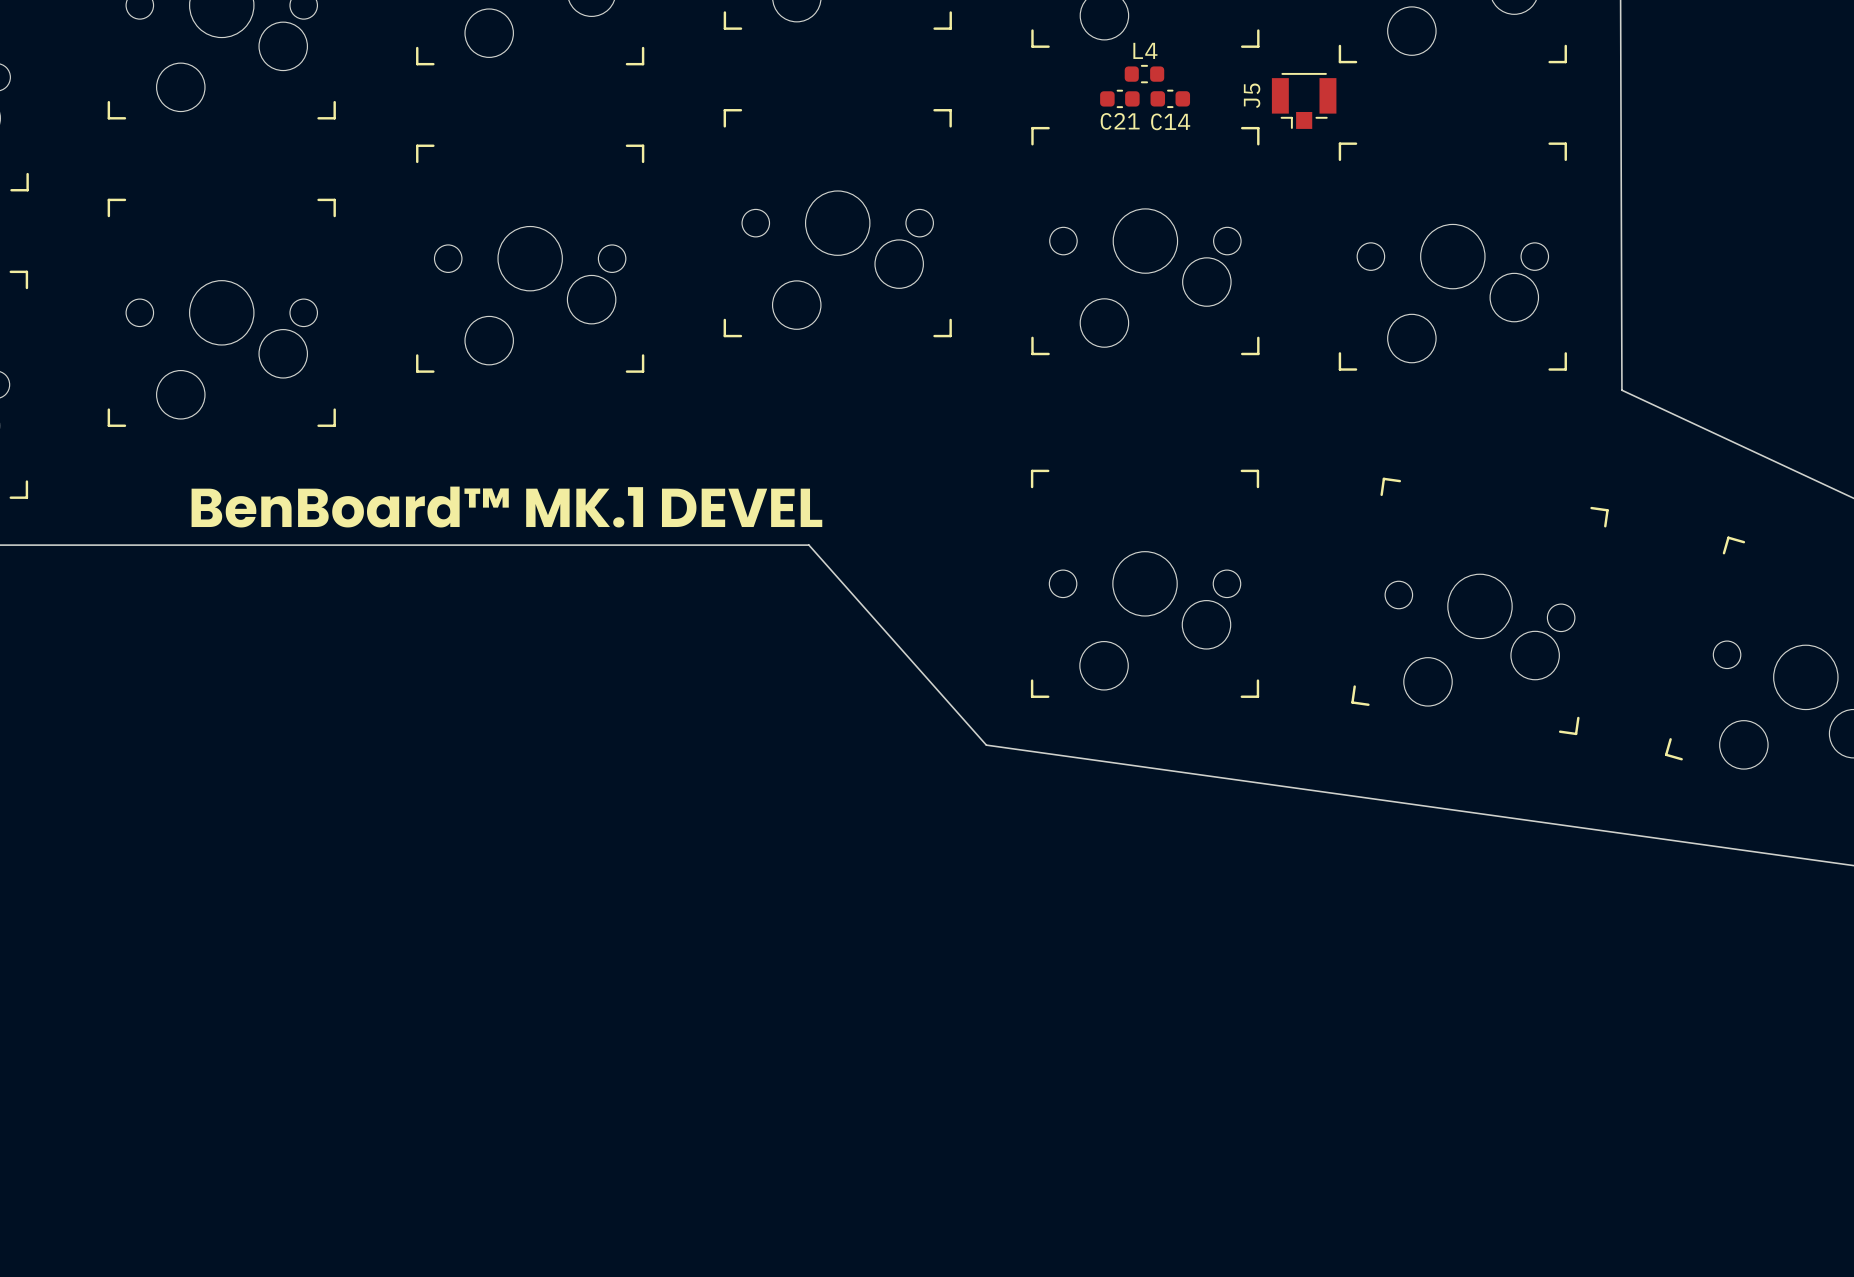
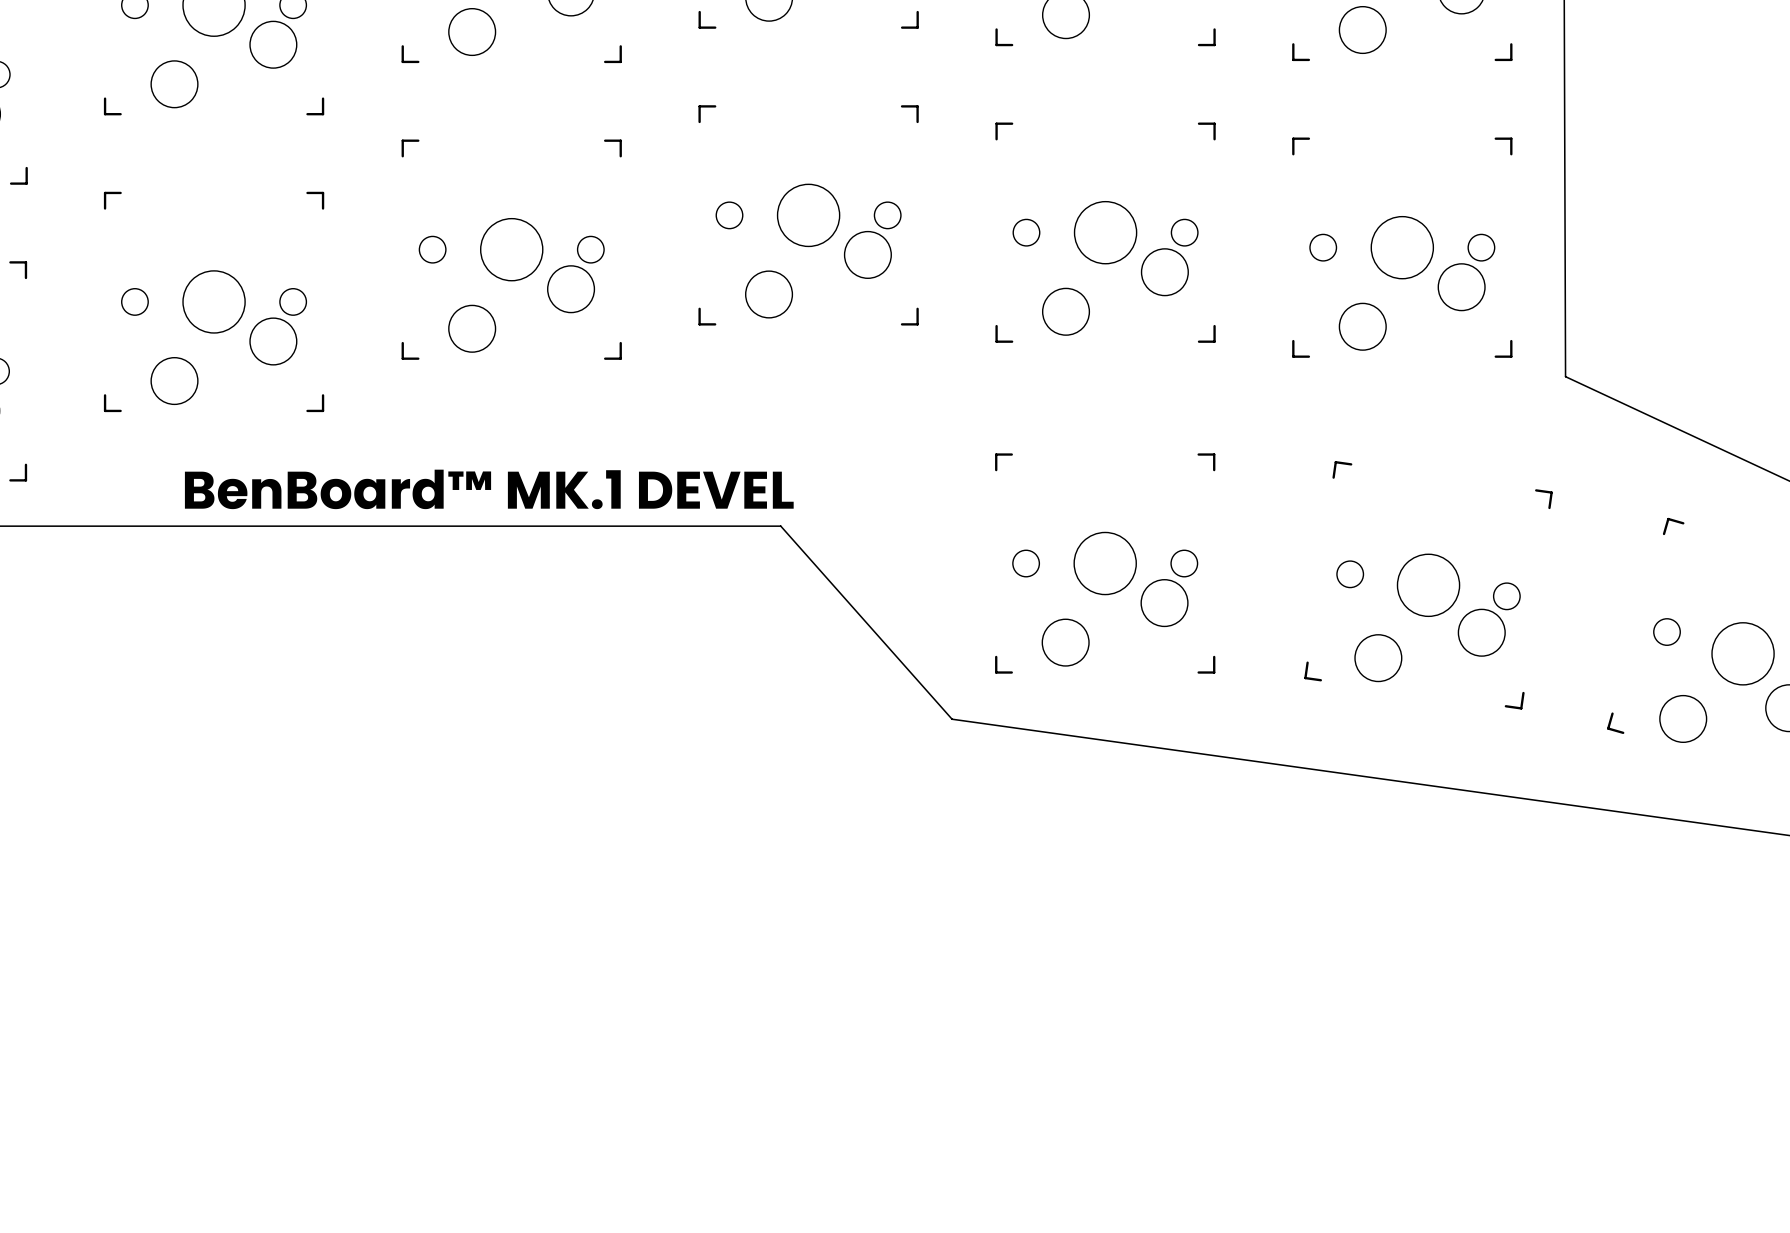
L4: (1144, 74) -> none
C21: (1119, 98) -> none
C14: (1170, 98) -> none
J5: (1304, 100) -> none

